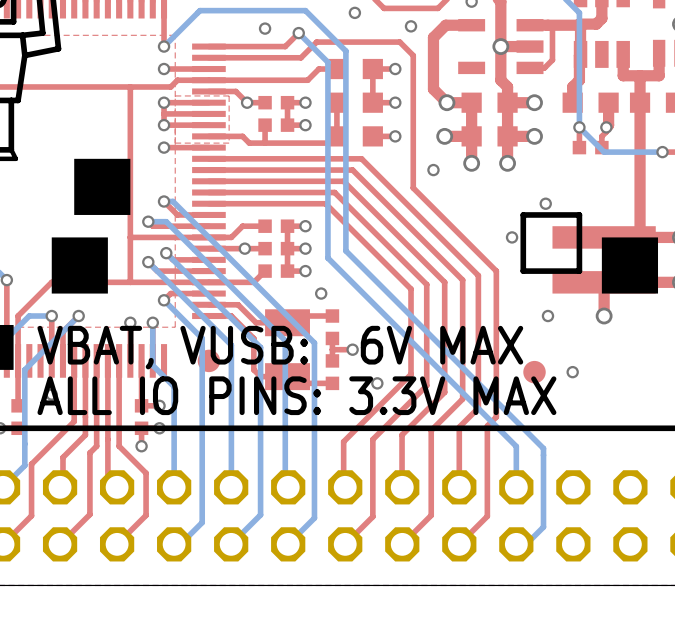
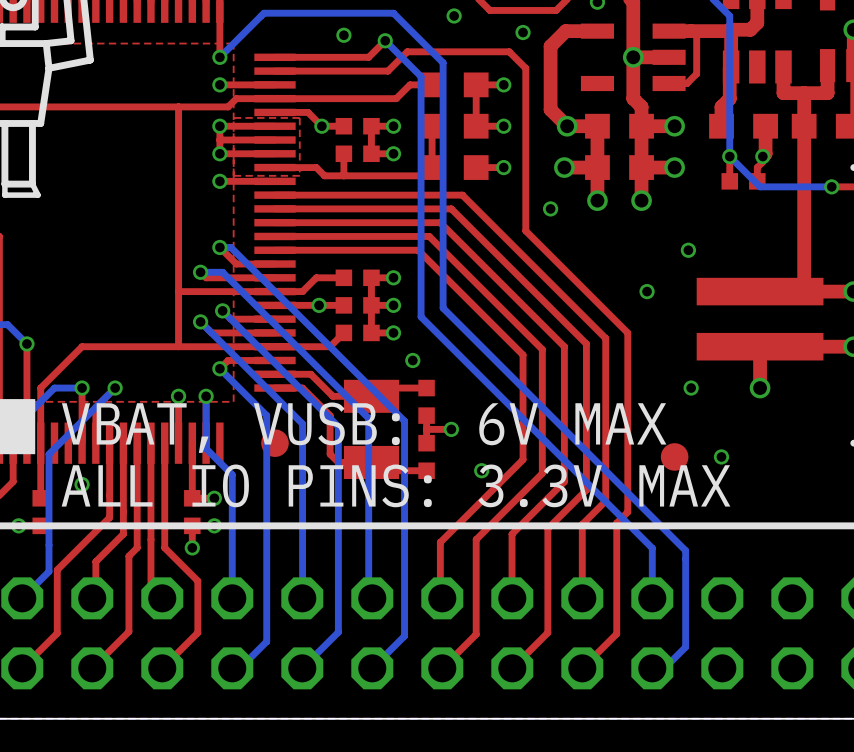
drawing: [51, 158, 131, 294] -> none
line: (579, 214) (579, 271) (523, 271) (523, 214) (579, 214) -> none
drawing: [601, 237, 659, 294] -> none

